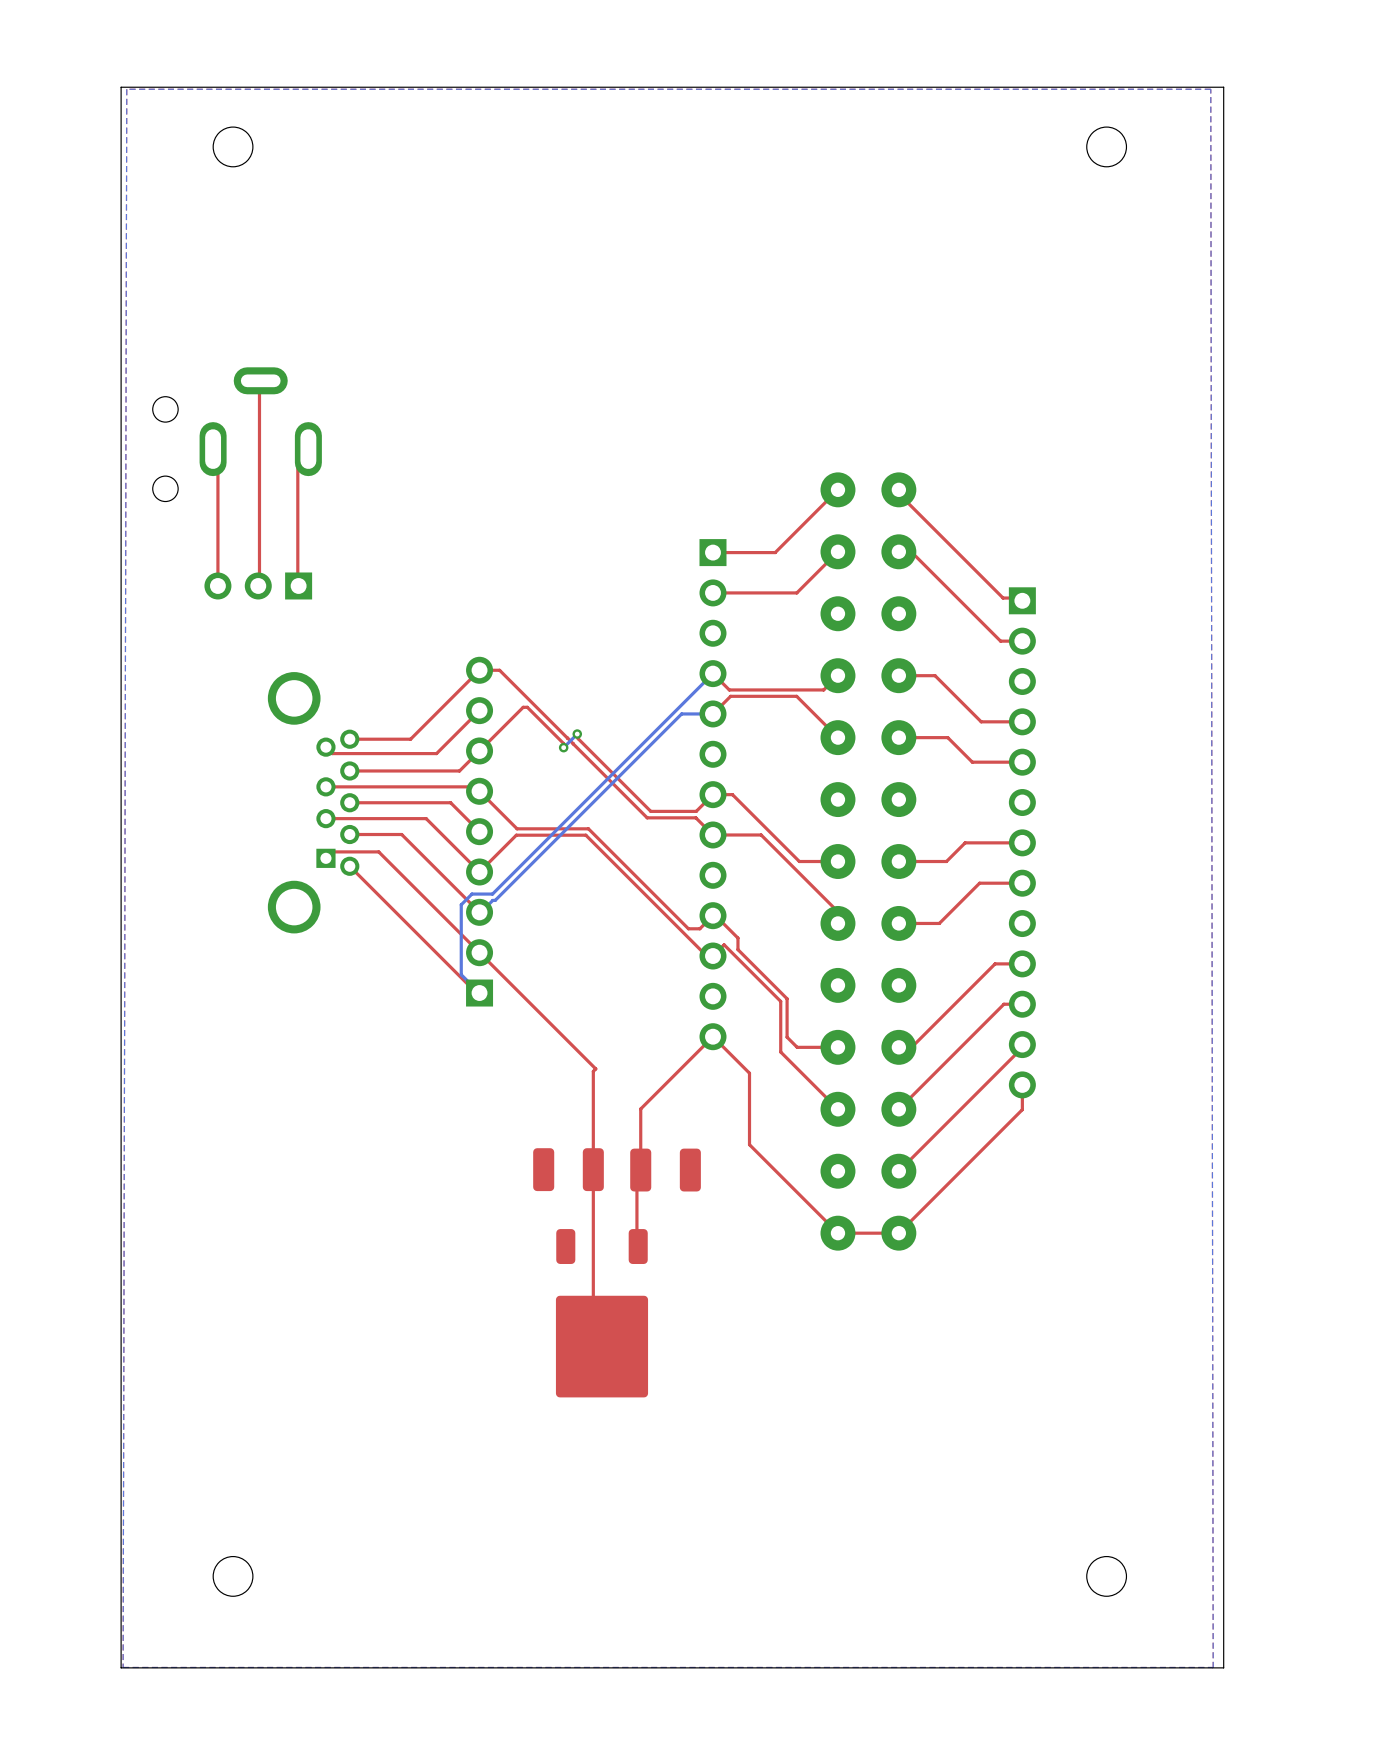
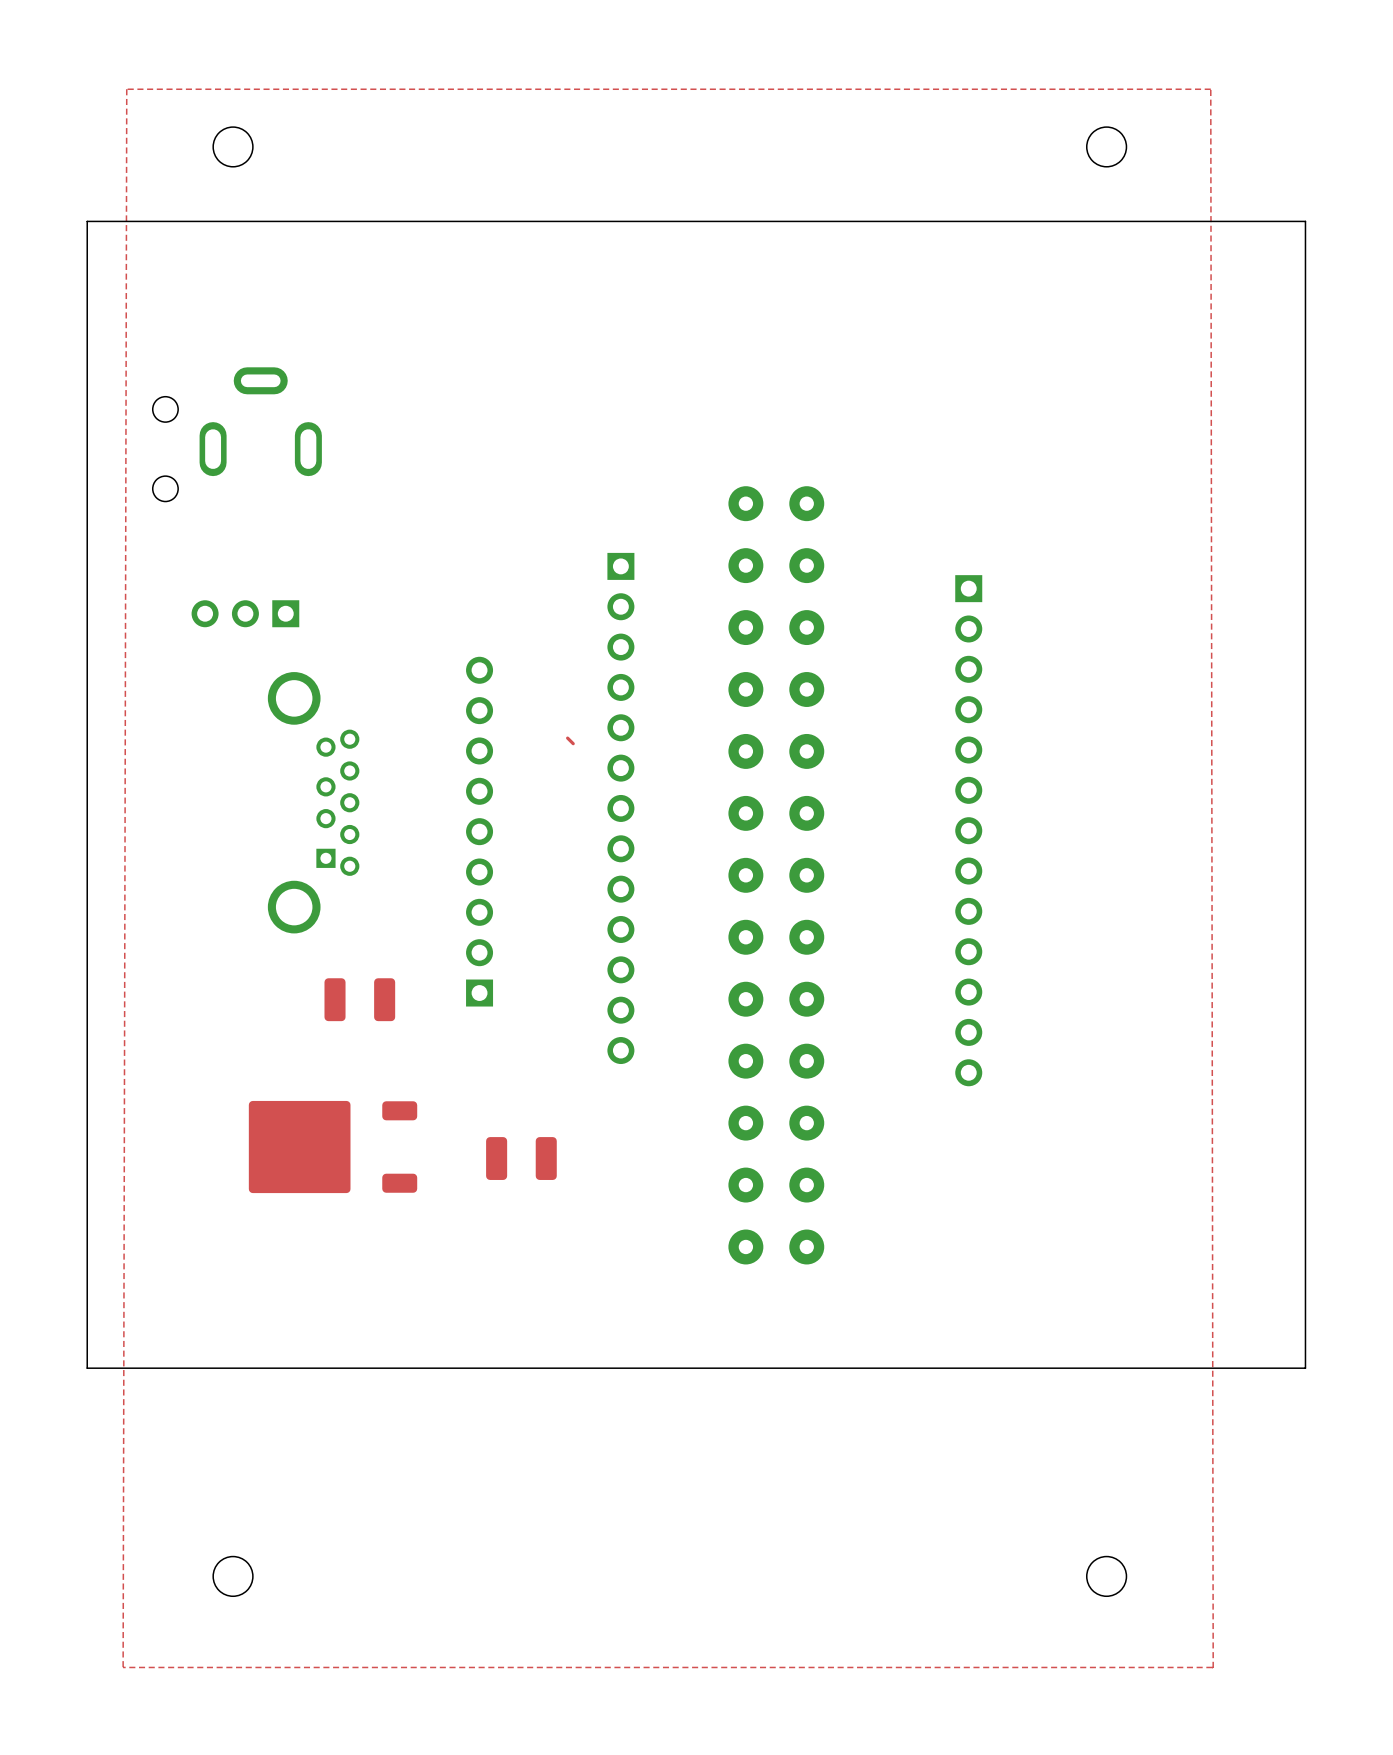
board edge: (1223, 87) (121, 87) (121, 1667) (1223, 1667) (1223, 87) -> (1305, 221) (1305, 1368) (87, 1368) (87, 221) (1305, 221)
bottom zone outline: (1210, 89) (126, 89) (123, 1667) (1213, 1667) (1210, 89) -> none
top track: (260, 380) (258, 585) -> none
top track: (213, 449) (217, 453) (217, 585) -> none
top track: (308, 449) (297, 459) (298, 585) -> none
top track: (837, 489) (775, 552) (712, 552) -> none
top track: (898, 489) (898, 493) (1003, 598) (1025, 598) (1022, 600) -> none
top track: (837, 551) (796, 592) (712, 592) -> none
top track: (898, 551) (911, 551) (1000, 641) (1022, 641) -> none
part position: (258, 585) -> (245, 613)
top track: (712, 673) (729, 689) (823, 689) (837, 675) -> none
bottom track: (712, 673) (492, 894) (471, 894) (461, 904) (461, 974) (479, 993) -> none
top track: (898, 675) (935, 675) (981, 721) (1022, 721) -> none
top track: (479, 710) (436, 753) (332, 753) (325, 747) -> none
top track: (712, 713) (730, 696) (796, 696) (837, 737) -> none
bottom track: (712, 713) (681, 713) (495, 900) (479, 912) -> none
top track: (577, 734) (578, 738) (650, 811) (696, 811) (712, 794) (732, 794) (799, 861) (837, 861) -> none
bottom track: (577, 734) (563, 747) -> none
via: (577, 734) -> none
top track: (898, 737) (947, 737) (972, 762) (1022, 762) -> none
top track: (567, 738) (499, 670) (479, 670) (410, 739) (349, 739) -> none
top track: (573, 743) (647, 817) (695, 817) (712, 834) (761, 834) (837, 911) (837, 923) -> none
top track: (563, 747) (563, 743) (527, 707) (523, 707) (459, 770) (349, 770) -> none
via: (563, 747) -> none
top track: (325, 786) (475, 786) (517, 828) (588, 828) (688, 928) (699, 928) (712, 915) (715, 915) (737, 938) (737, 949) (787, 998) (787, 1037) (797, 1047) (837, 1047) -> none
part position: (712, 794) -> (620, 808)
top track: (349, 802) (450, 802) (479, 831) -> none
top track: (325, 818) (426, 818) (479, 871) (516, 835) (585, 835) (706, 956) (712, 956) (724, 944) (780, 1001) (780, 1052) (837, 1109) (837, 1103) -> none
top track: (349, 834) (401, 834) (479, 912) -> none
top track: (1022, 842) (965, 842) (946, 861) (898, 861) -> none
part position: (1022, 842) -> (968, 830)
top track: (325, 858) (332, 851) (378, 851) (595, 1068) (593, 1071) (593, 1337) (602, 1346) -> none
part position: (868, 861) -> (776, 875)
top track: (349, 866) (476, 993) (479, 993) -> none
top track: (1022, 883) (979, 883) (939, 923) (898, 923) -> none
top track: (1022, 963) (995, 963) (911, 1047) (898, 1047) -> none
part: none -> (359, 999)
top track: (1022, 1004) (1003, 1004) (898, 1109) -> none
top track: (1022, 1044) (1022, 1047) (898, 1171) -> none
top track: (1022, 1084) (1022, 1109) (898, 1233) (837, 1233) (749, 1144) (749, 1073) (712, 1036) (640, 1108) (640, 1170) (636, 1173) (638, 1246) -> none
part position: (568, 1169) -> (521, 1158)
part: (665, 1170) -> none
part rotation: 0° (602, 1313) -> 90° clockwise (333, 1147)
part position: (602, 1313) -> (333, 1147)

